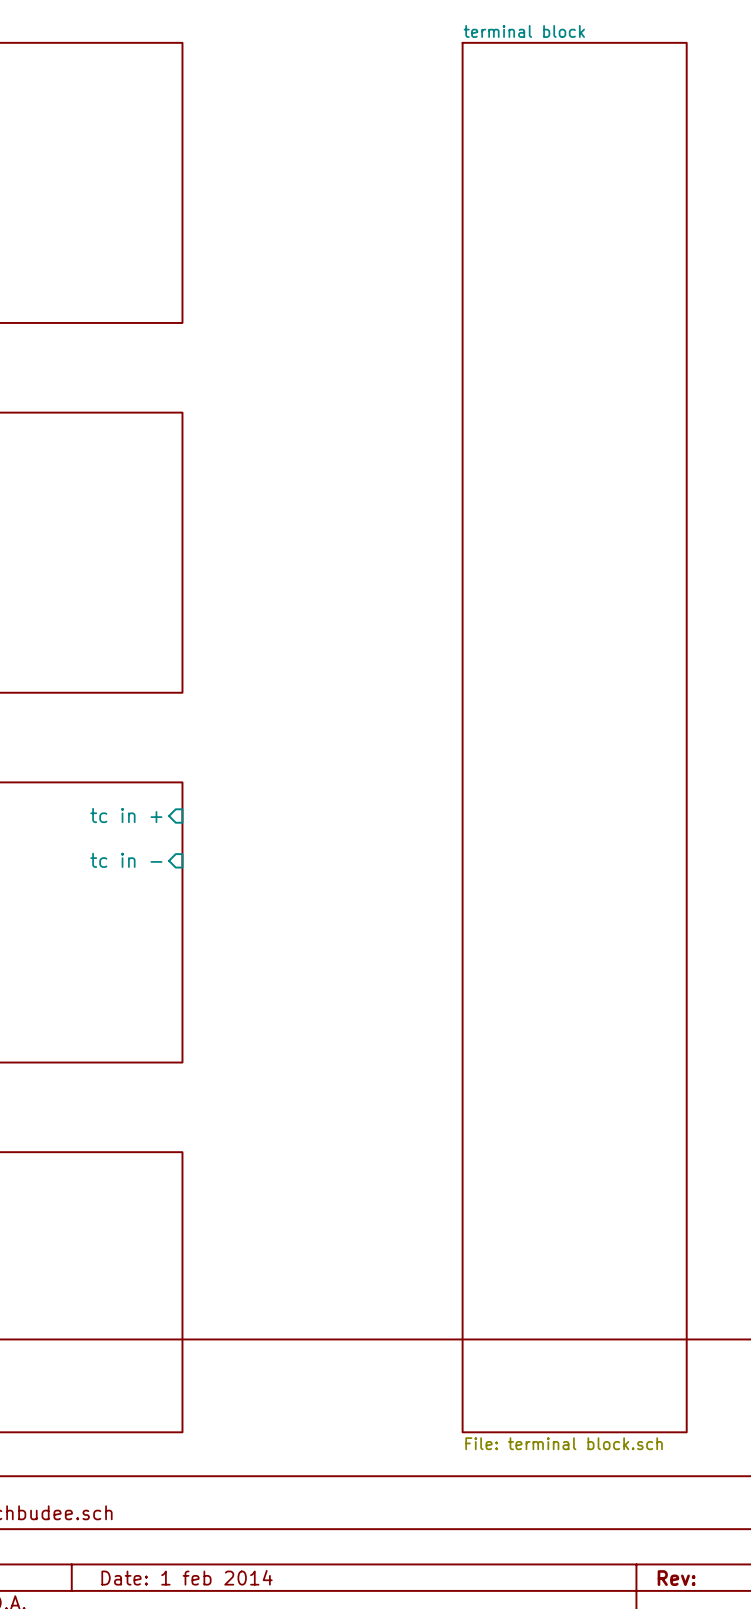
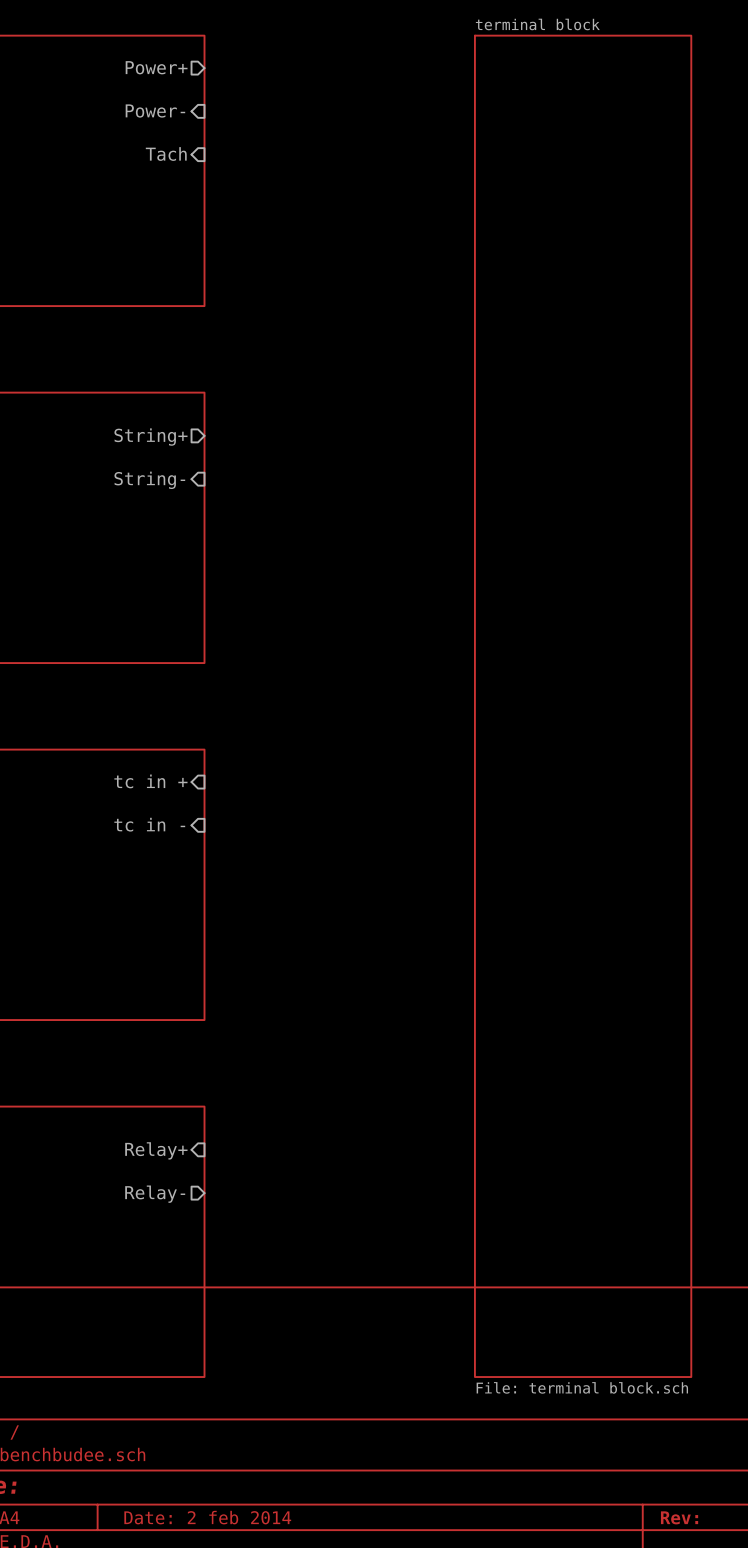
sheet pin: none -> Power+ (156, 67)
sheet pin: none -> Power- (155, 111)
sheet pin: none -> Tach (166, 154)
sheet pin: none -> String+ (150, 437)
sheet pin: none -> String- (149, 480)
sheet pin: none -> Relay+ (156, 1150)
sheet pin: none -> Relay- (155, 1194)
title block: Date: 1 feb 2014 (187, 1577) -> Date: 2 feb 2014 (207, 1517)

